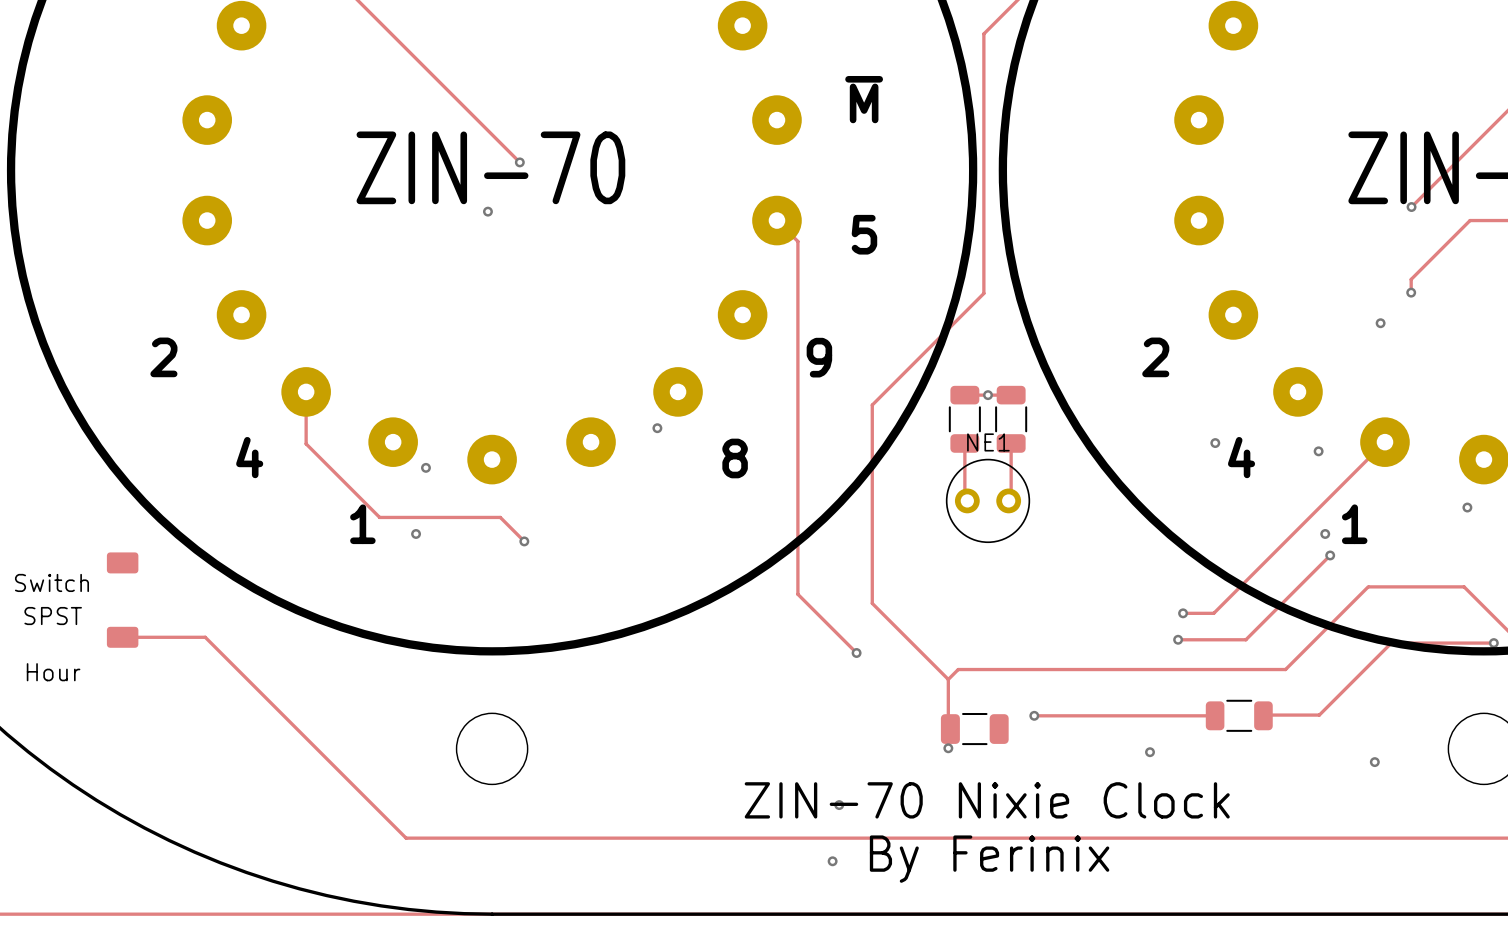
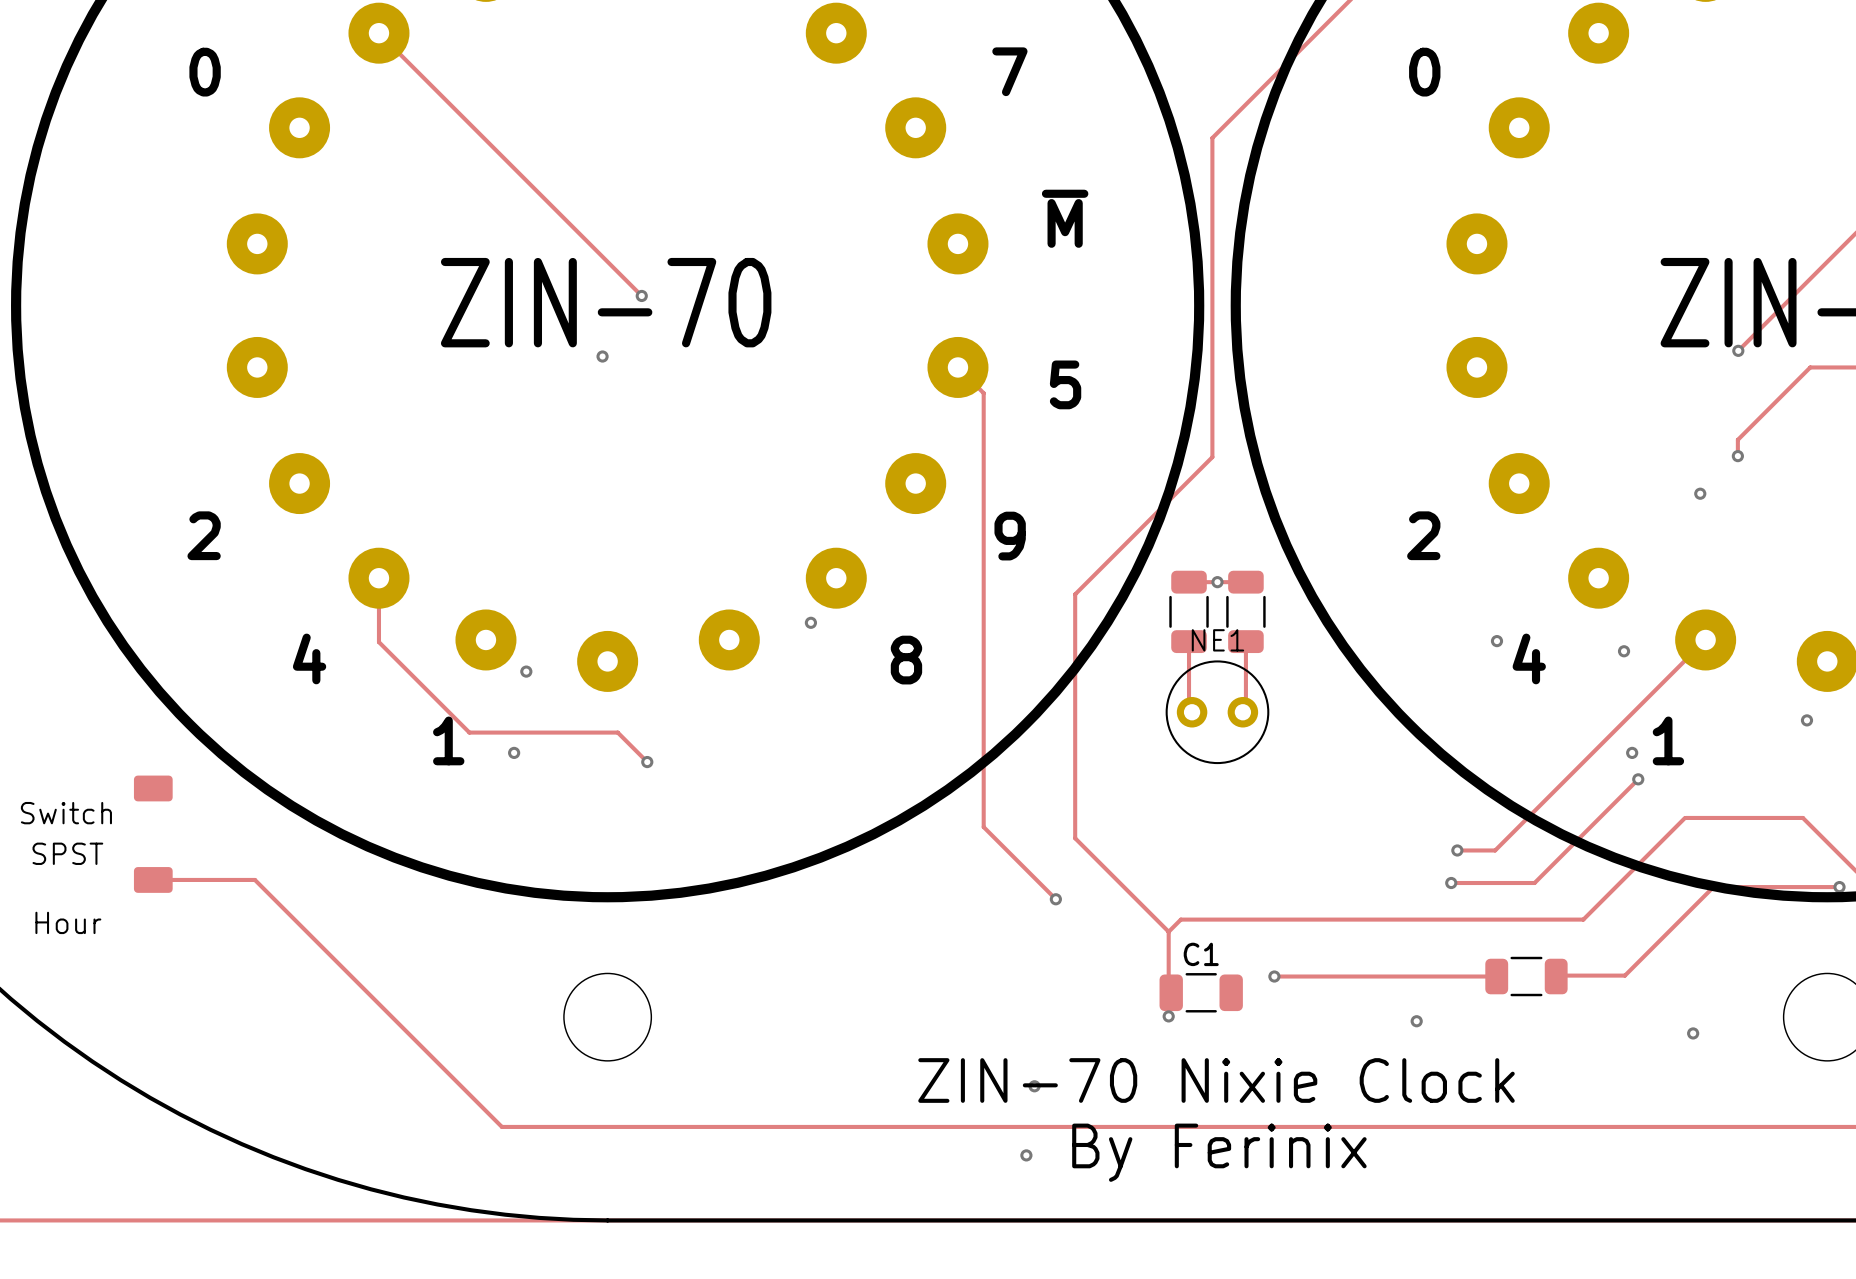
C1 name: none -> C1 (1201, 954)

